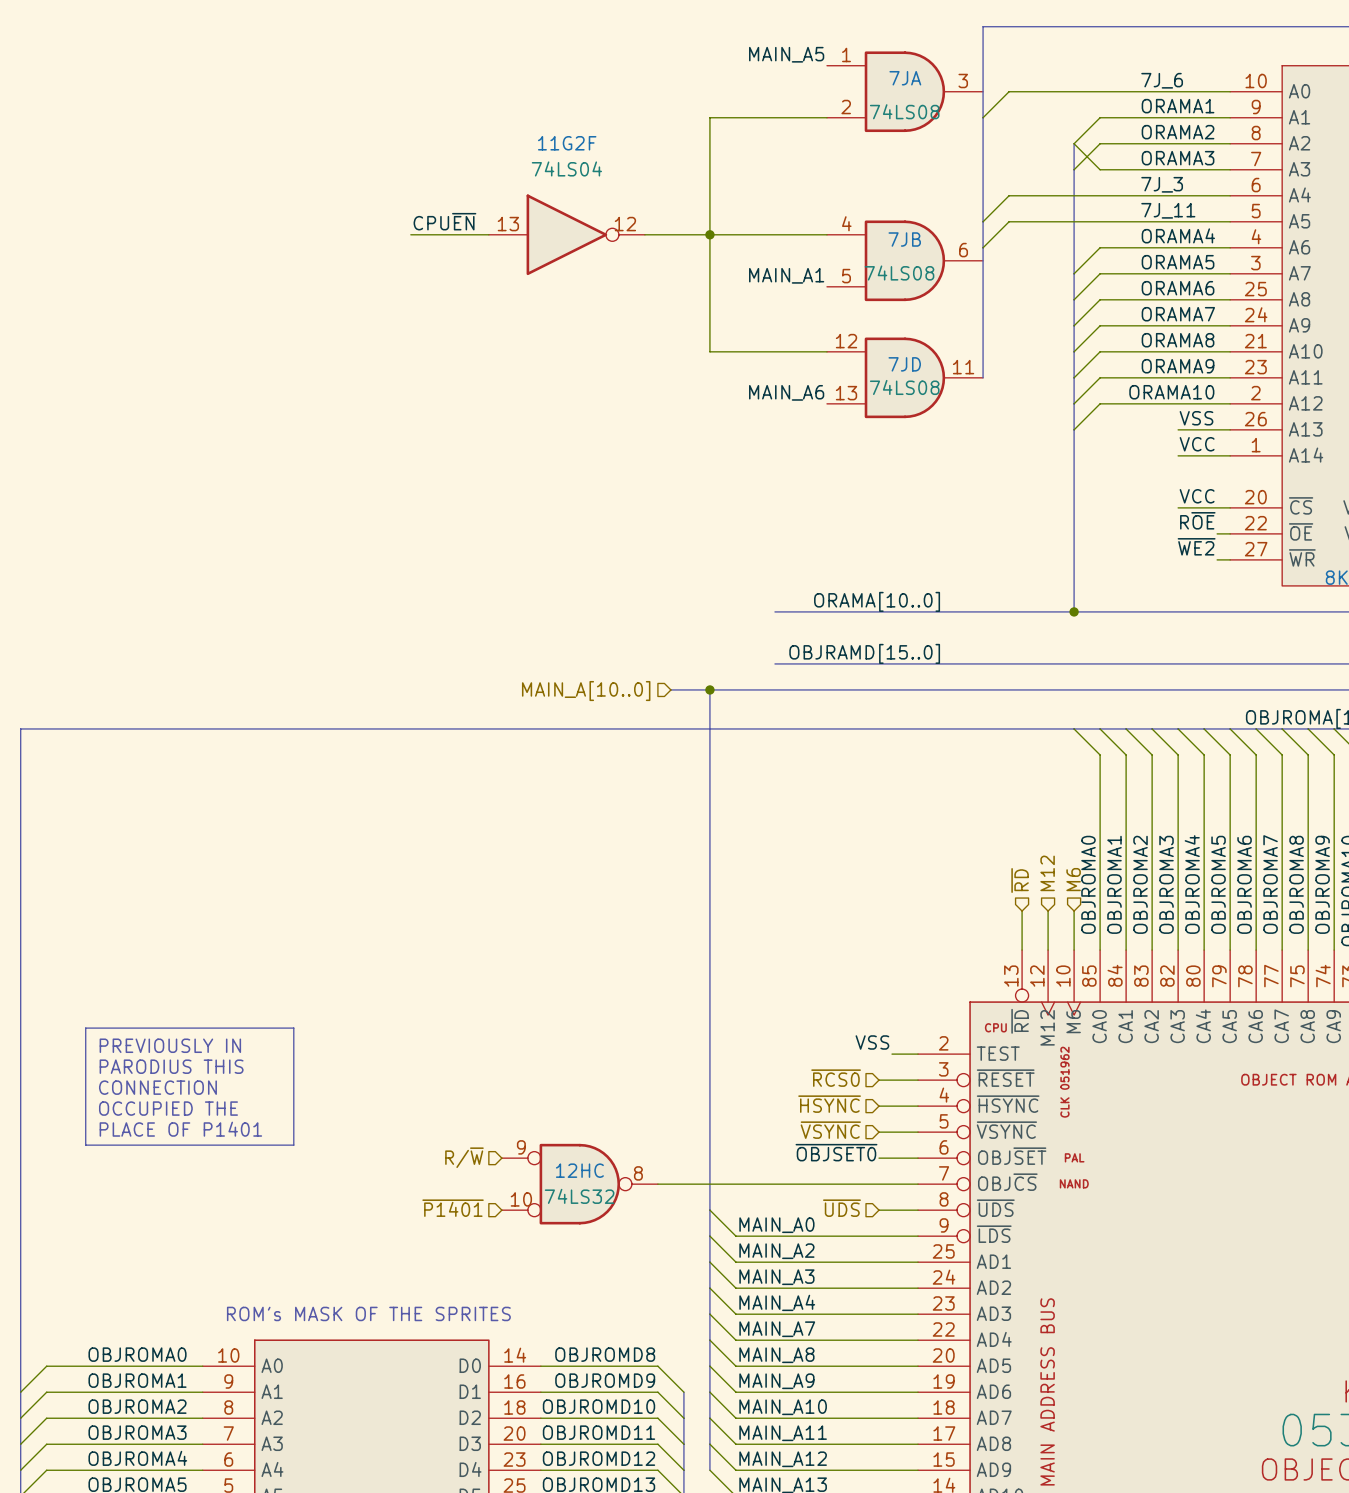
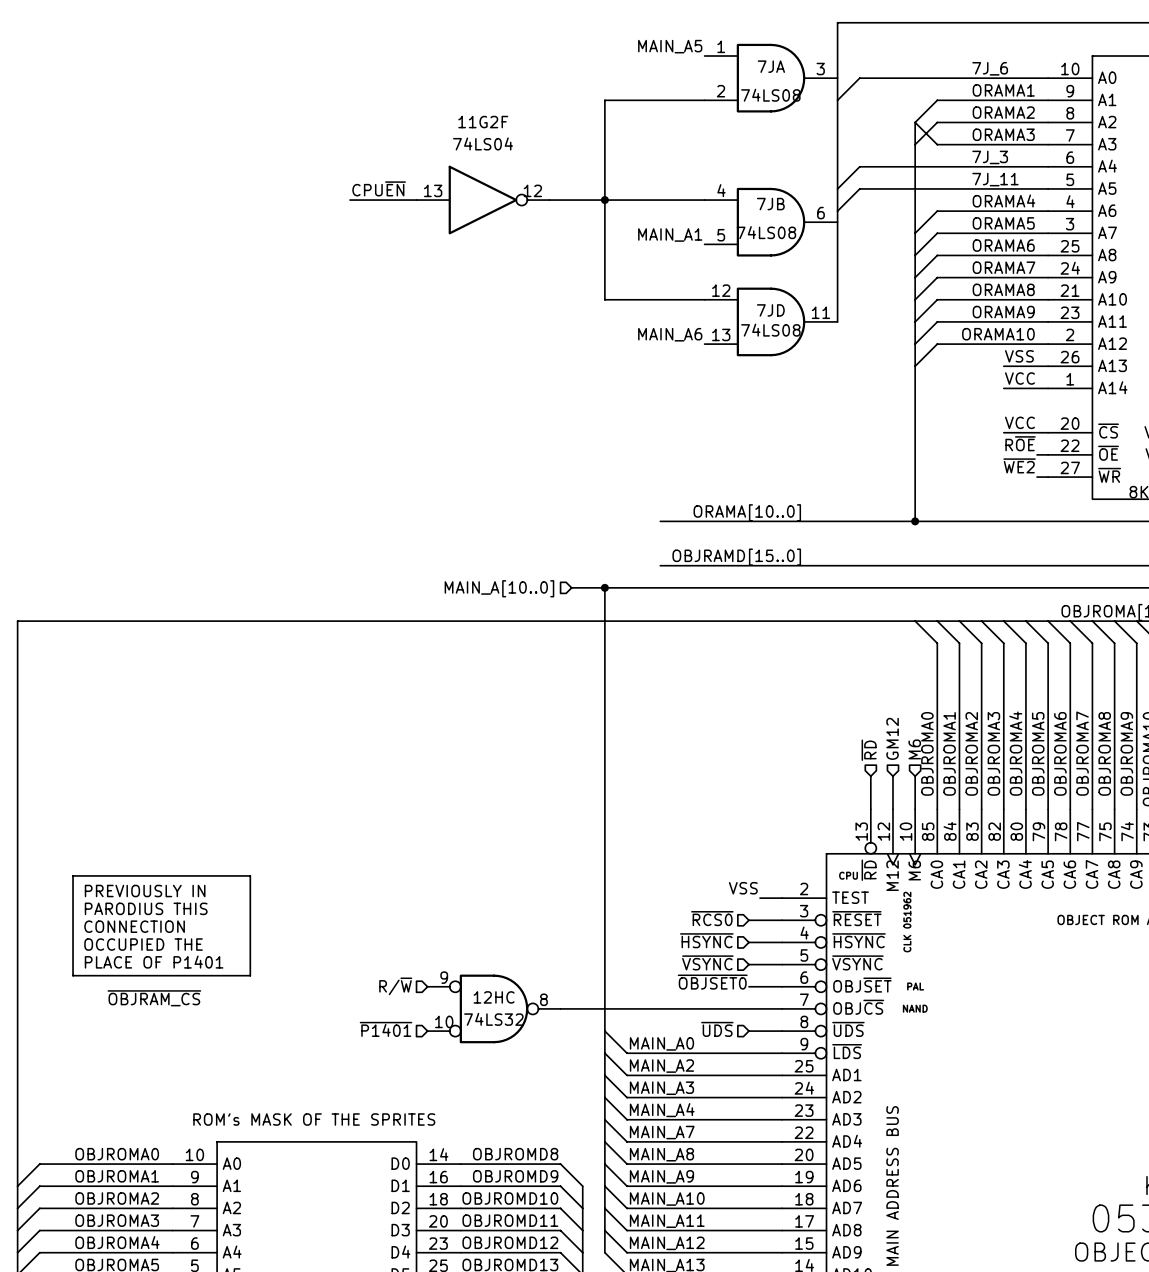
hierarchical label: M12 (1047, 873) -> GM12 (892, 738)
label: none -> ~{OBJRAM_CS} (154, 998)

